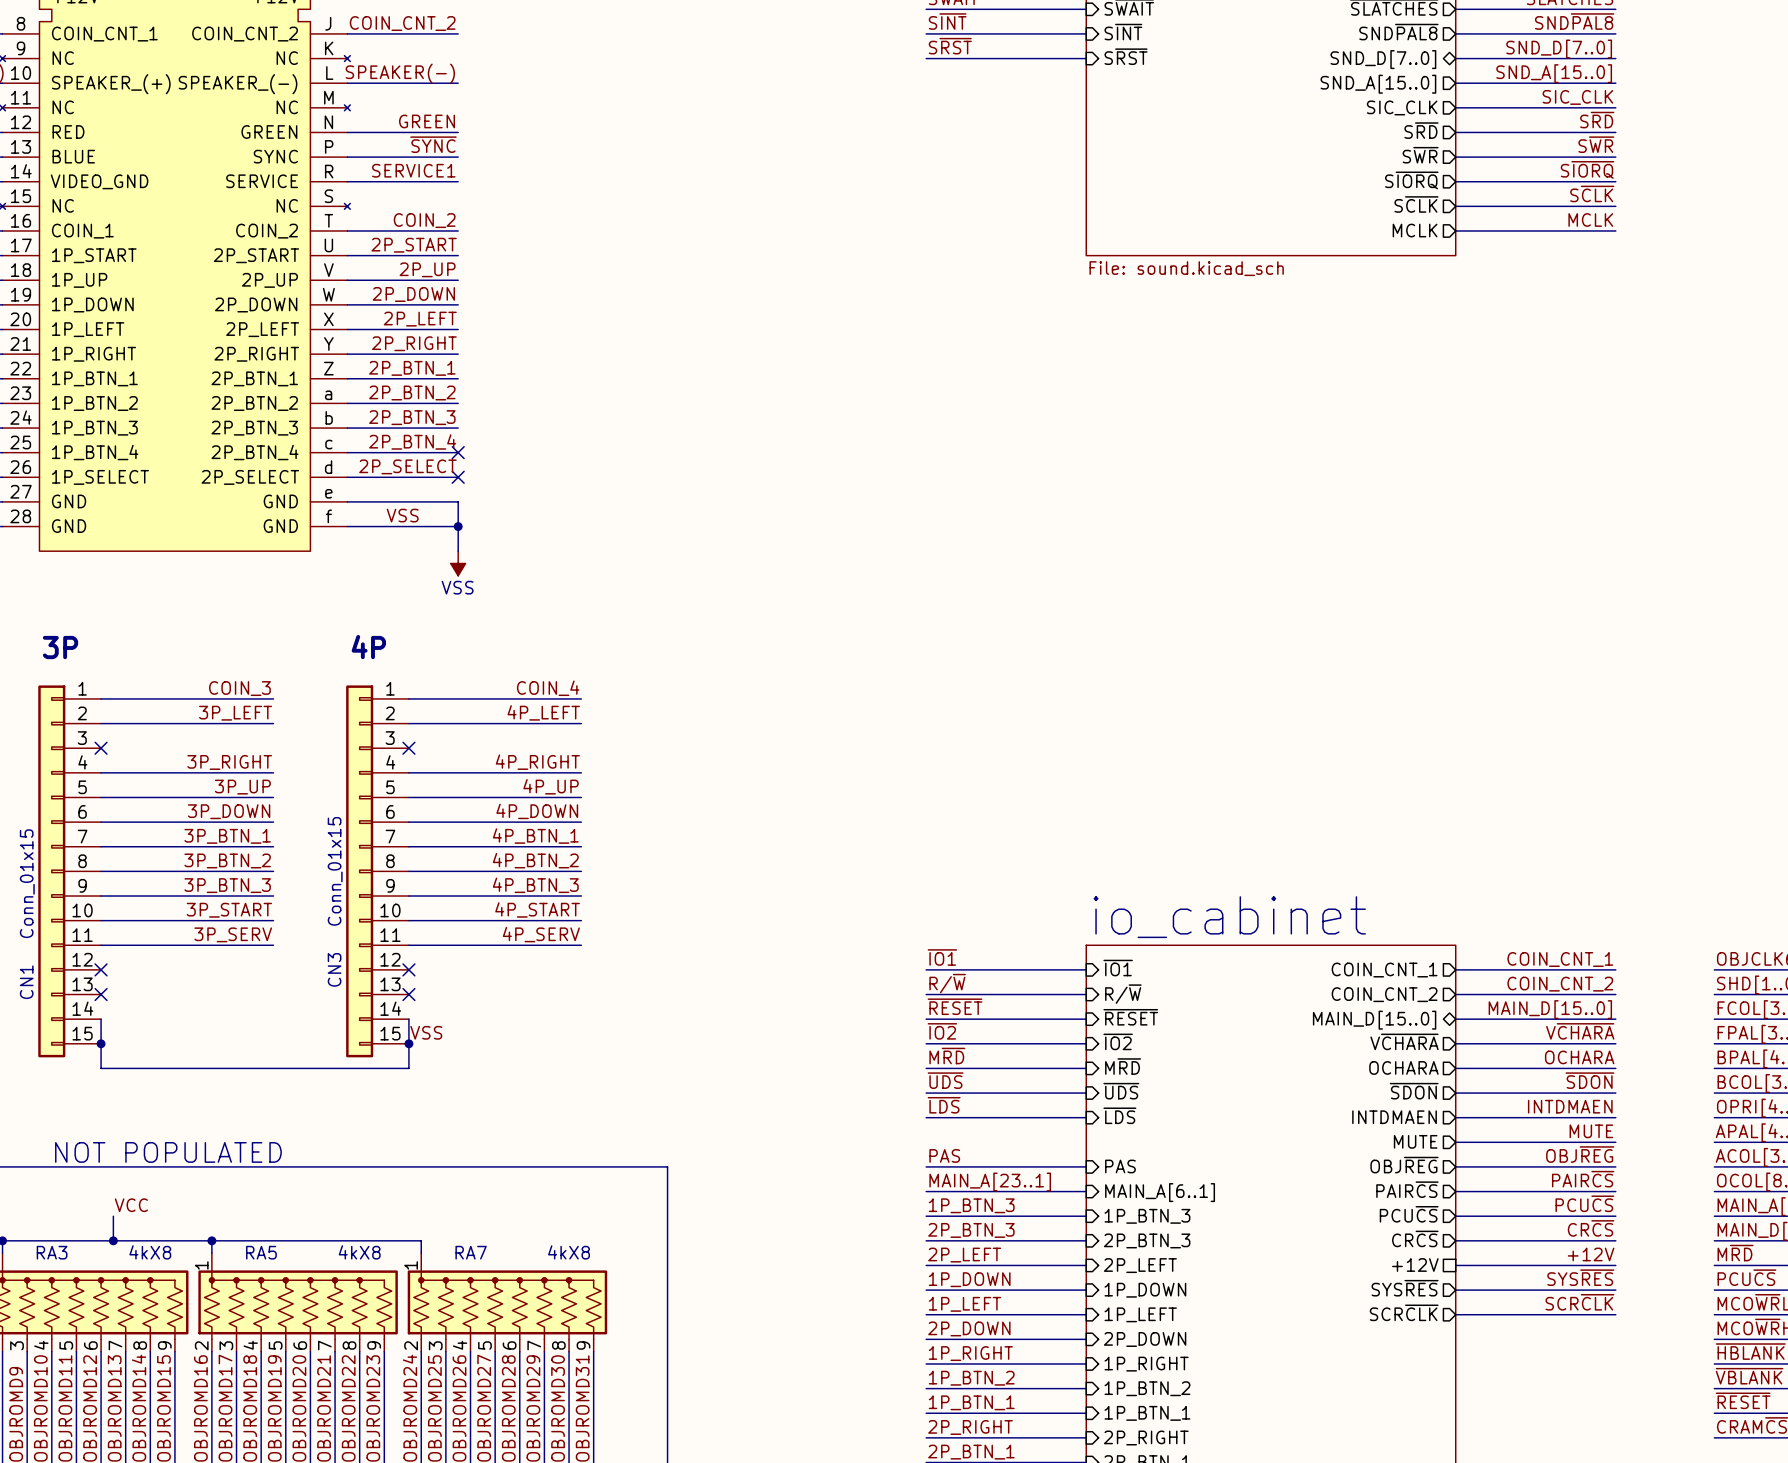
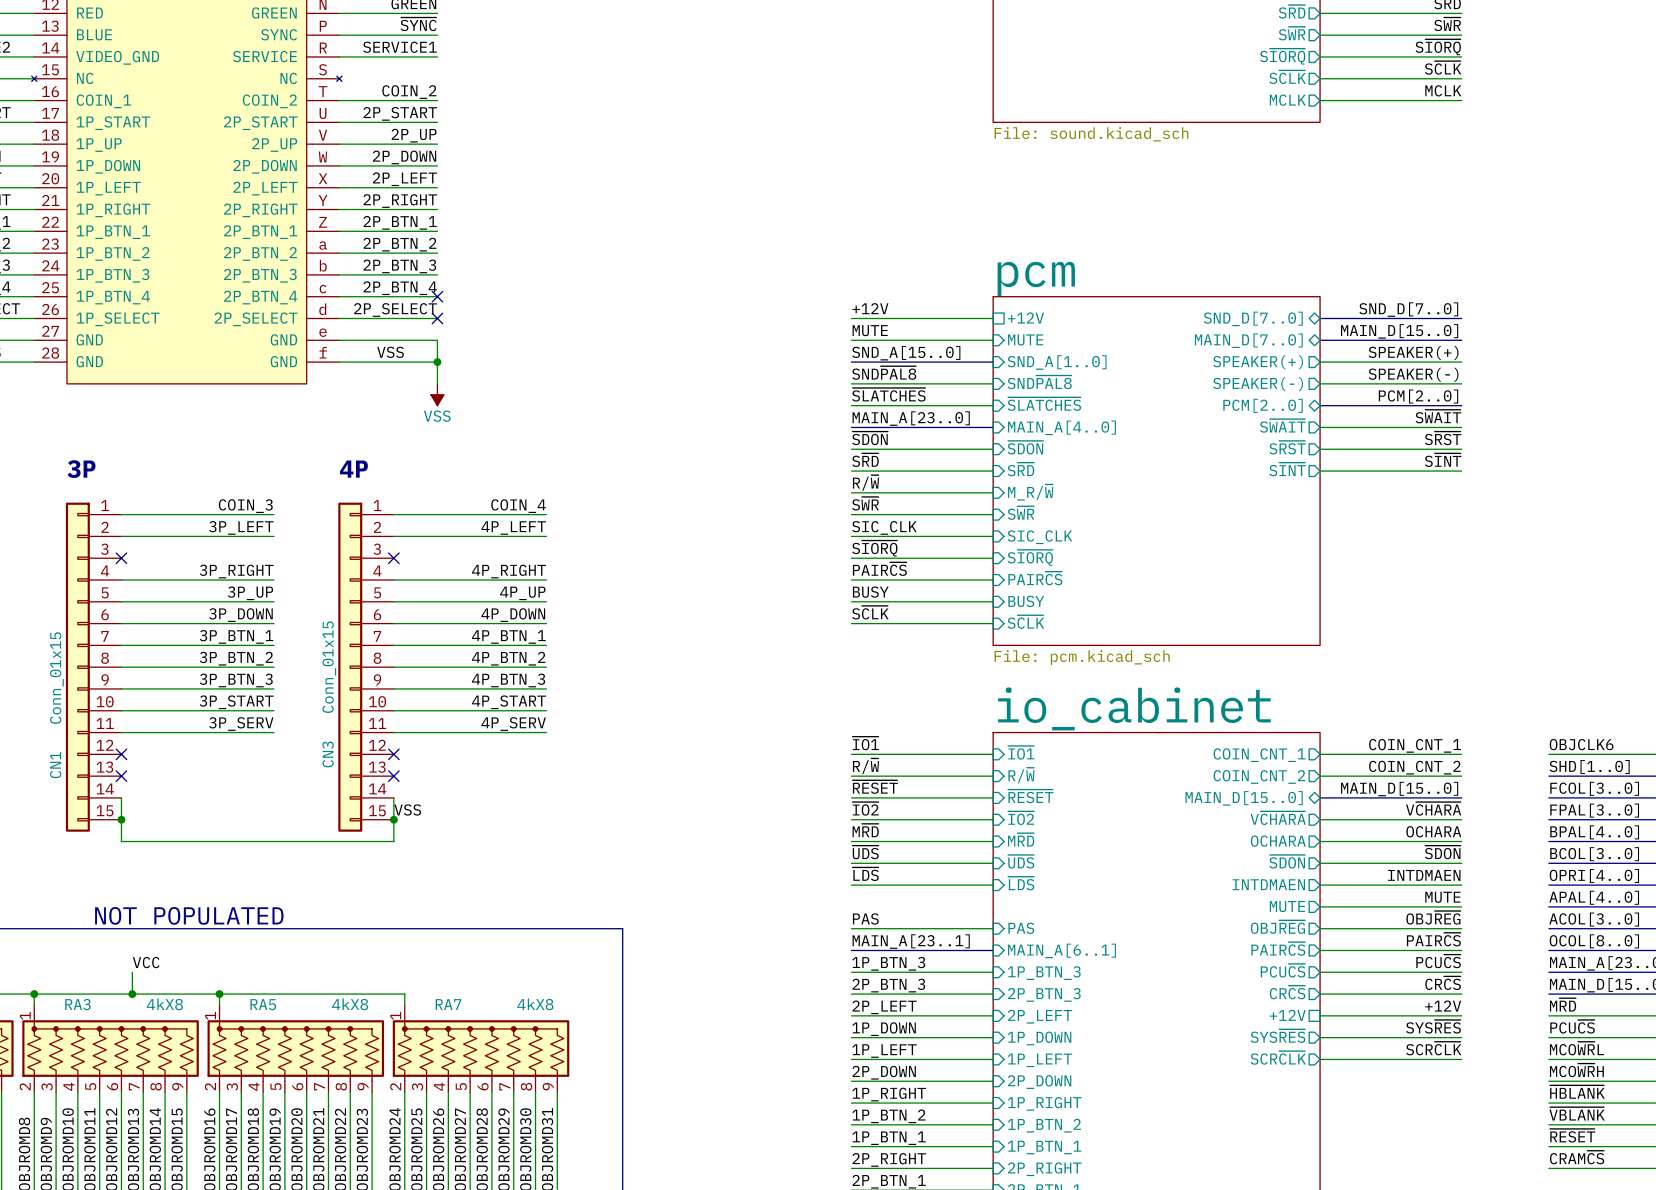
label: none -> +12V (870, 308)
label: none -> SND_D[7..0] (1408, 309)
sheet pin: none -> +12V (1025, 317)
wire: none -> (851, 318) (993, 318)
bus: none -> (1320, 318) (1461, 318)
sheet pin: none -> SND_D[7..0] (1253, 318)
label: none -> MUTE (870, 330)
label: none -> MAIN_D[15..0] (1399, 331)
wire: none -> (851, 340) (993, 340)
sheet pin: none -> MUTE (1025, 339)
bus: none -> (1320, 340) (1461, 340)
sheet pin: none -> MAIN_D[7..0] (1248, 340)
label: none -> SND_A[15..0] (906, 353)
label: none -> SPEAKER(+) (1413, 352)
bus: none -> (851, 362) (993, 362)
wire: none -> (1320, 362) (1461, 362)
sheet pin: none -> SND_A[1..0] (1057, 362)
sheet pin: none -> SPEAKER(+) (1258, 362)
label: none -> SND~{PAL8} (884, 372)
label: none -> SPEAKER(-) (1413, 374)
sheet pin: none -> SND~{PAL8} (1039, 382)
wire: none -> (851, 383) (993, 383)
wire: none -> (1320, 383) (1461, 383)
sheet pin: none -> SPEAKER(-) (1258, 384)
label: none -> ~{SLATCHES} (888, 394)
label: none -> PCM[2..0] (1418, 396)
sheet pin: none -> ~{SLATCHES} (1044, 404)
wire: none -> (851, 405) (993, 405)
bus: none -> (1320, 405) (1461, 405)
sheet pin: none -> PCM[2..0] (1263, 405)
label: none -> S~{WAIT} (1438, 416)
label: none -> MAIN_A[23..0] (911, 418)
sheet pin: none -> S~{WAIT} (1282, 425)
bus: none -> (851, 427) (993, 427)
wire: none -> (1320, 427) (1461, 427)
sheet pin: none -> MAIN_A[4..0] (1061, 427)
label: none -> ~{SDON} (870, 438)
label: none -> S~{RST} (1443, 438)
sheet pin: none -> ~{SDON} (1025, 447)
sheet pin: none -> S~{RST} (1287, 447)
wire: none -> (851, 449) (993, 449)
wire: none -> (1320, 449) (1461, 449)
label: none -> S~{RD} (865, 460)
label: none -> S~{INT} (1443, 460)
sheet pin: none -> S~{RD} (1020, 469)
sheet pin: none -> S~{INT} (1287, 469)
wire: none -> (851, 471) (993, 471)
sheet pcm: none -> File: pcm.kicad_sch (1156, 471)
wire: none -> (1320, 471) (1461, 471)
label: none -> R/~{W} (865, 482)
sheet pin: none -> M_R/~{W} (1030, 492)
wire: none -> (851, 492) (993, 492)
label: none -> S~{WR} (865, 503)
sheet pin: none -> S~{WR} (1021, 513)
wire: none -> (851, 514) (993, 514)
label: none -> SIC_CLK (884, 527)
wire: none -> (851, 536) (993, 536)
sheet pin: none -> SIC_CLK (1039, 537)
label: none -> S~{IORQ} (874, 548)
sheet pin: none -> S~{IORQ} (1030, 557)
wire: none -> (851, 558) (993, 558)
label: none -> PAIR~{CS} (879, 569)
sheet pin: none -> PAIR~{CS} (1035, 578)
wire: none -> (851, 580) (993, 580)
label: none -> BUSY (870, 592)
wire: none -> (851, 601) (993, 601)
sheet pin: none -> BUSY (1026, 601)
label: none -> S~{CLK} (870, 612)
sheet pin: none -> S~{CLK} (1025, 622)
wire: none -> (851, 623) (993, 623)

